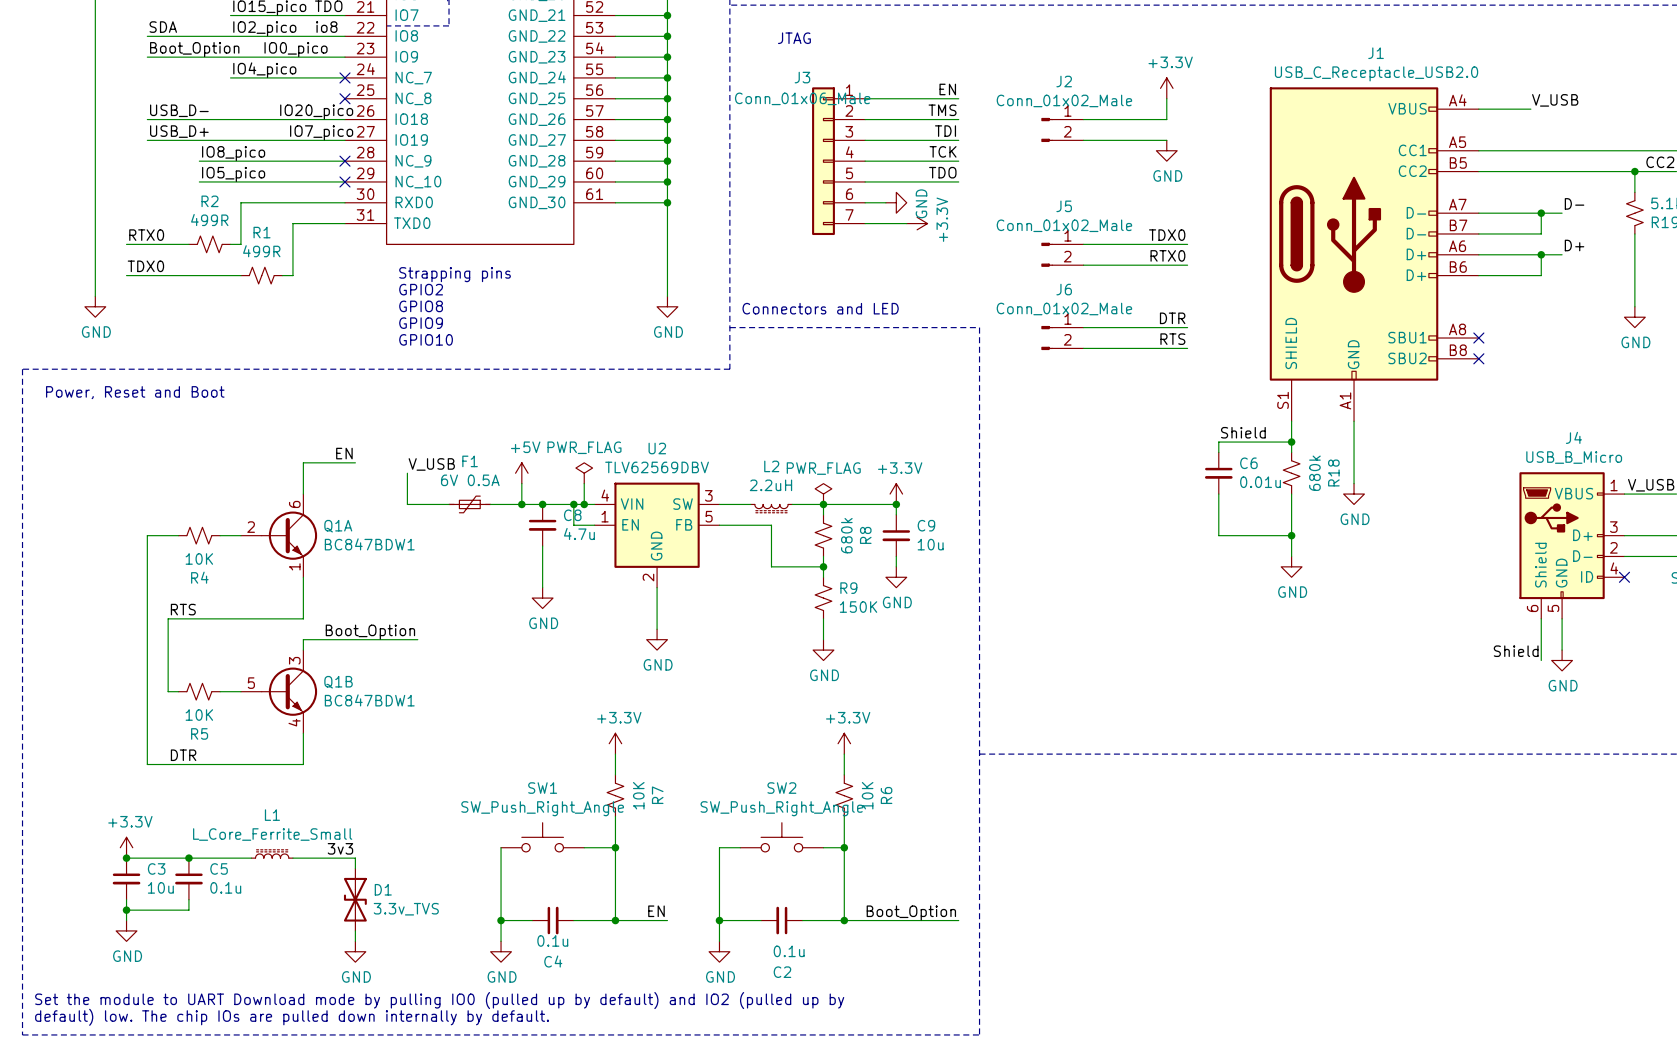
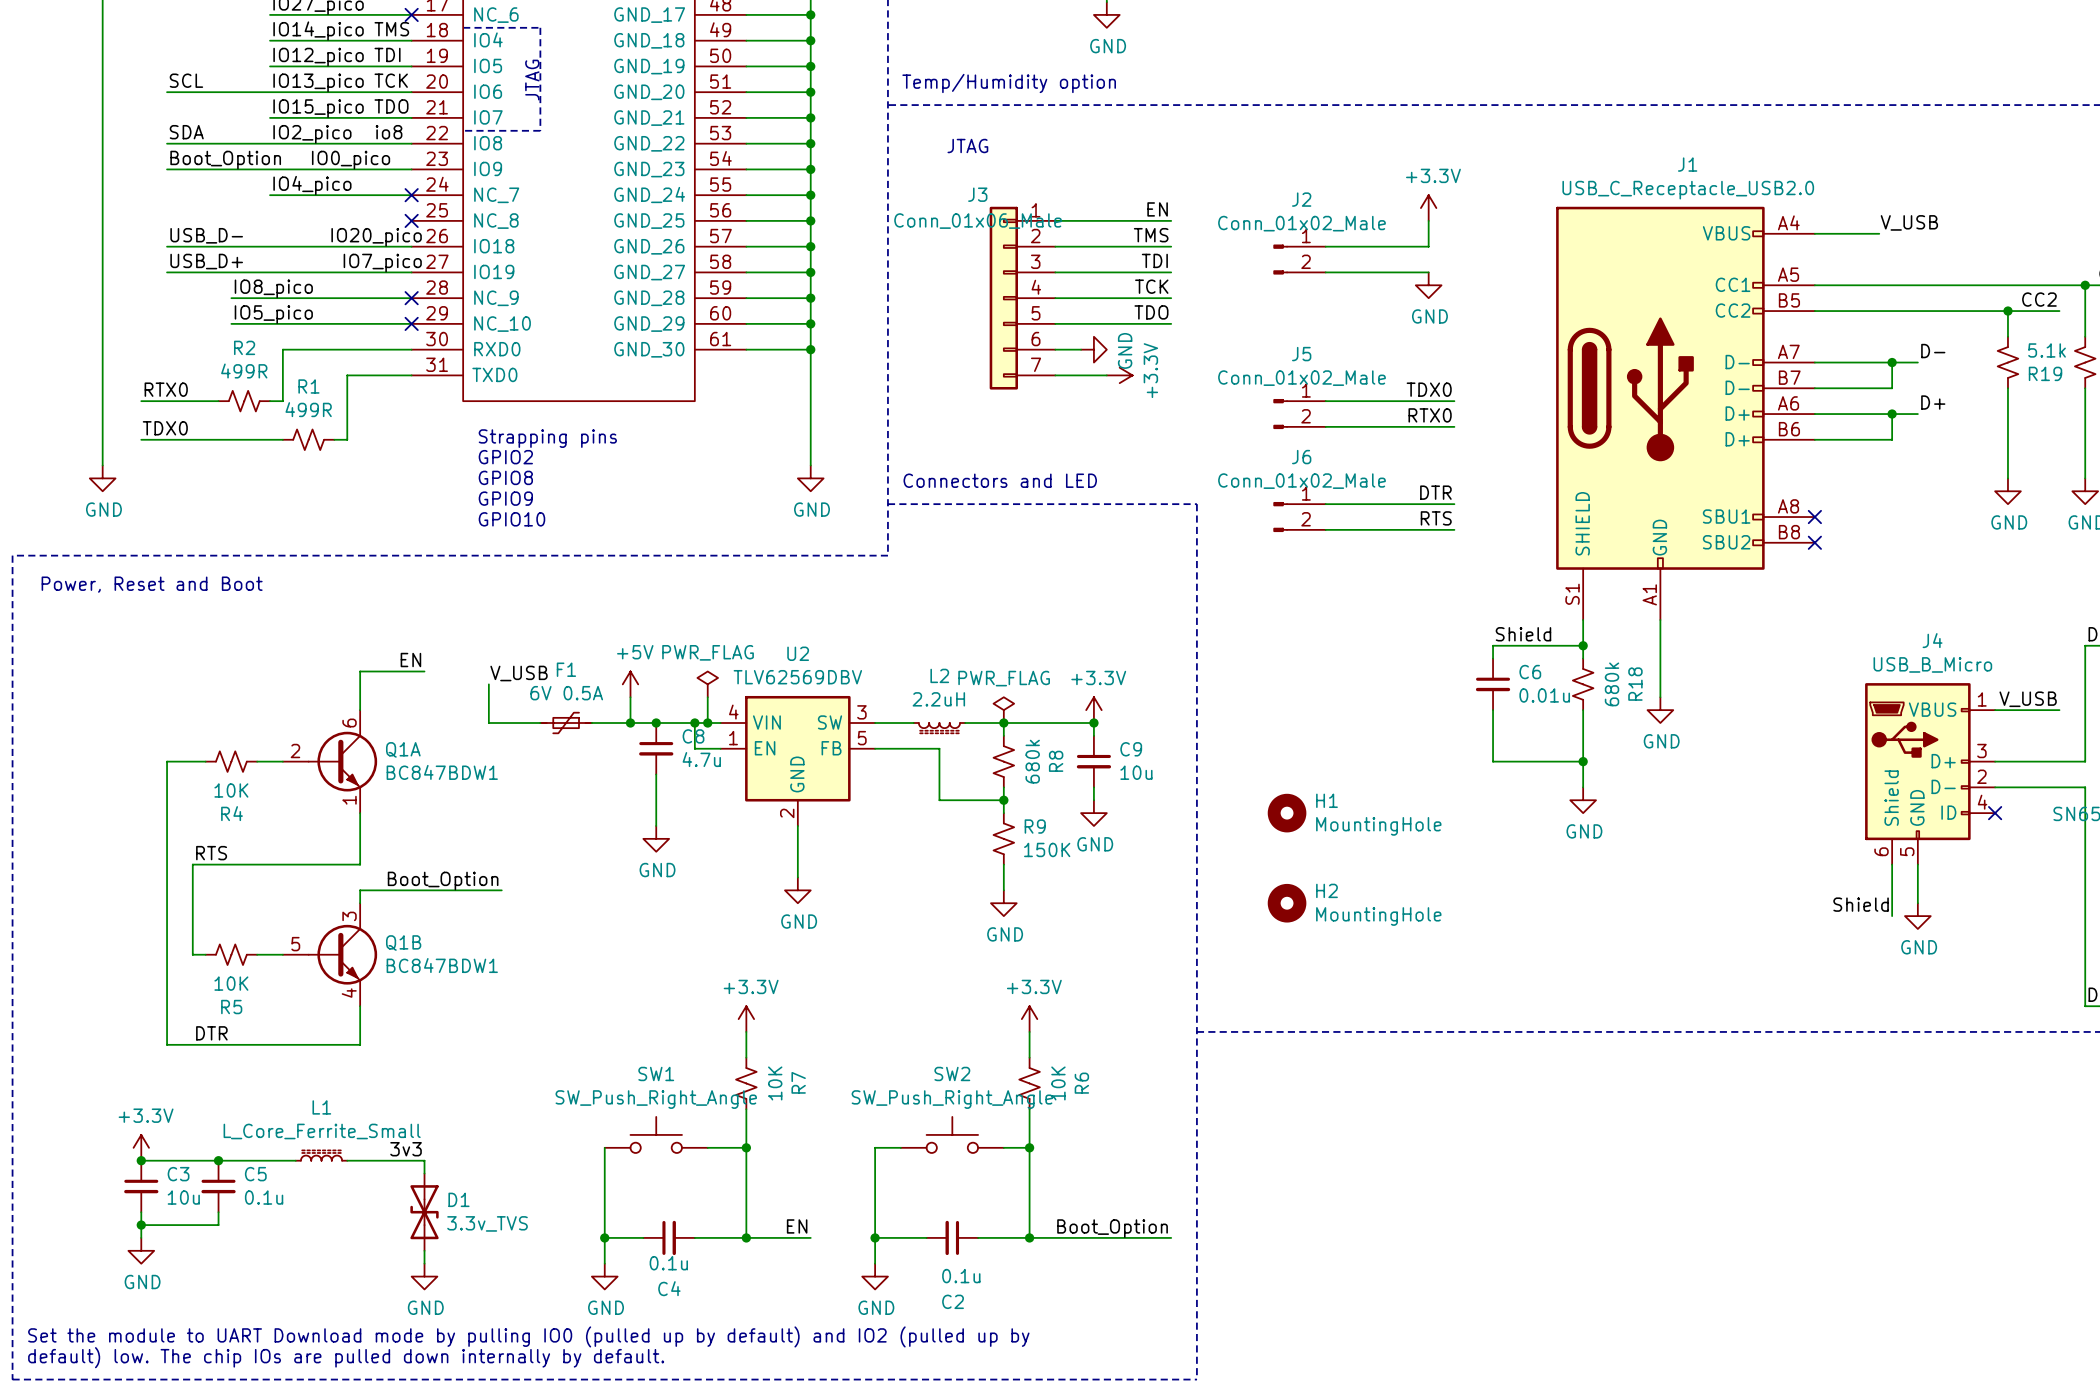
H1: none -> MountingHole (1287, 813)
H2: none -> MountingHole (1287, 903)

